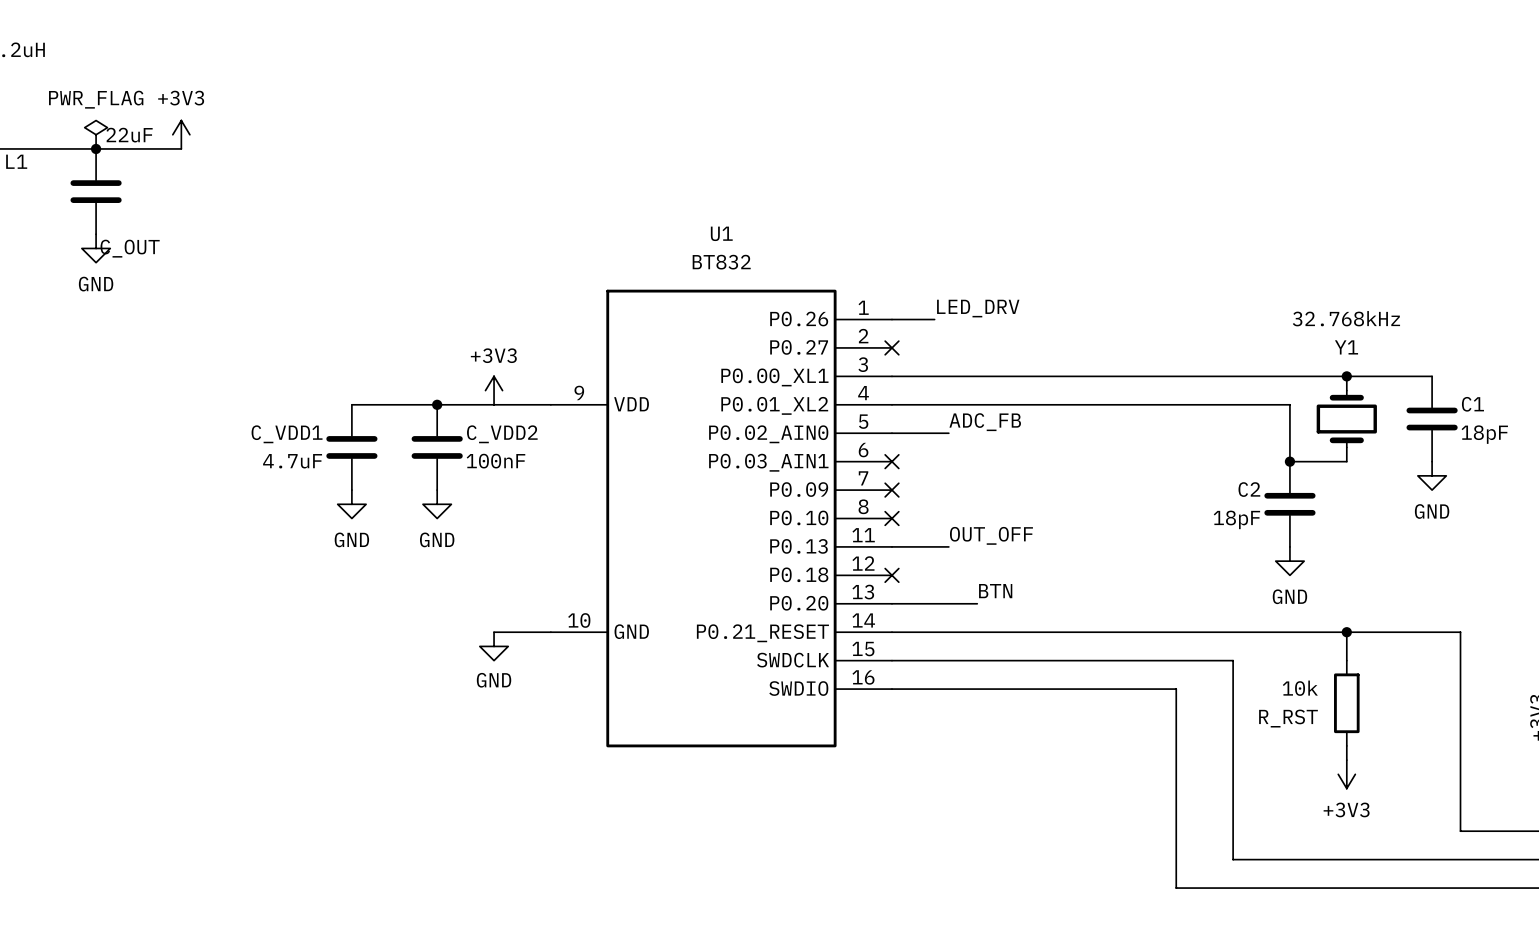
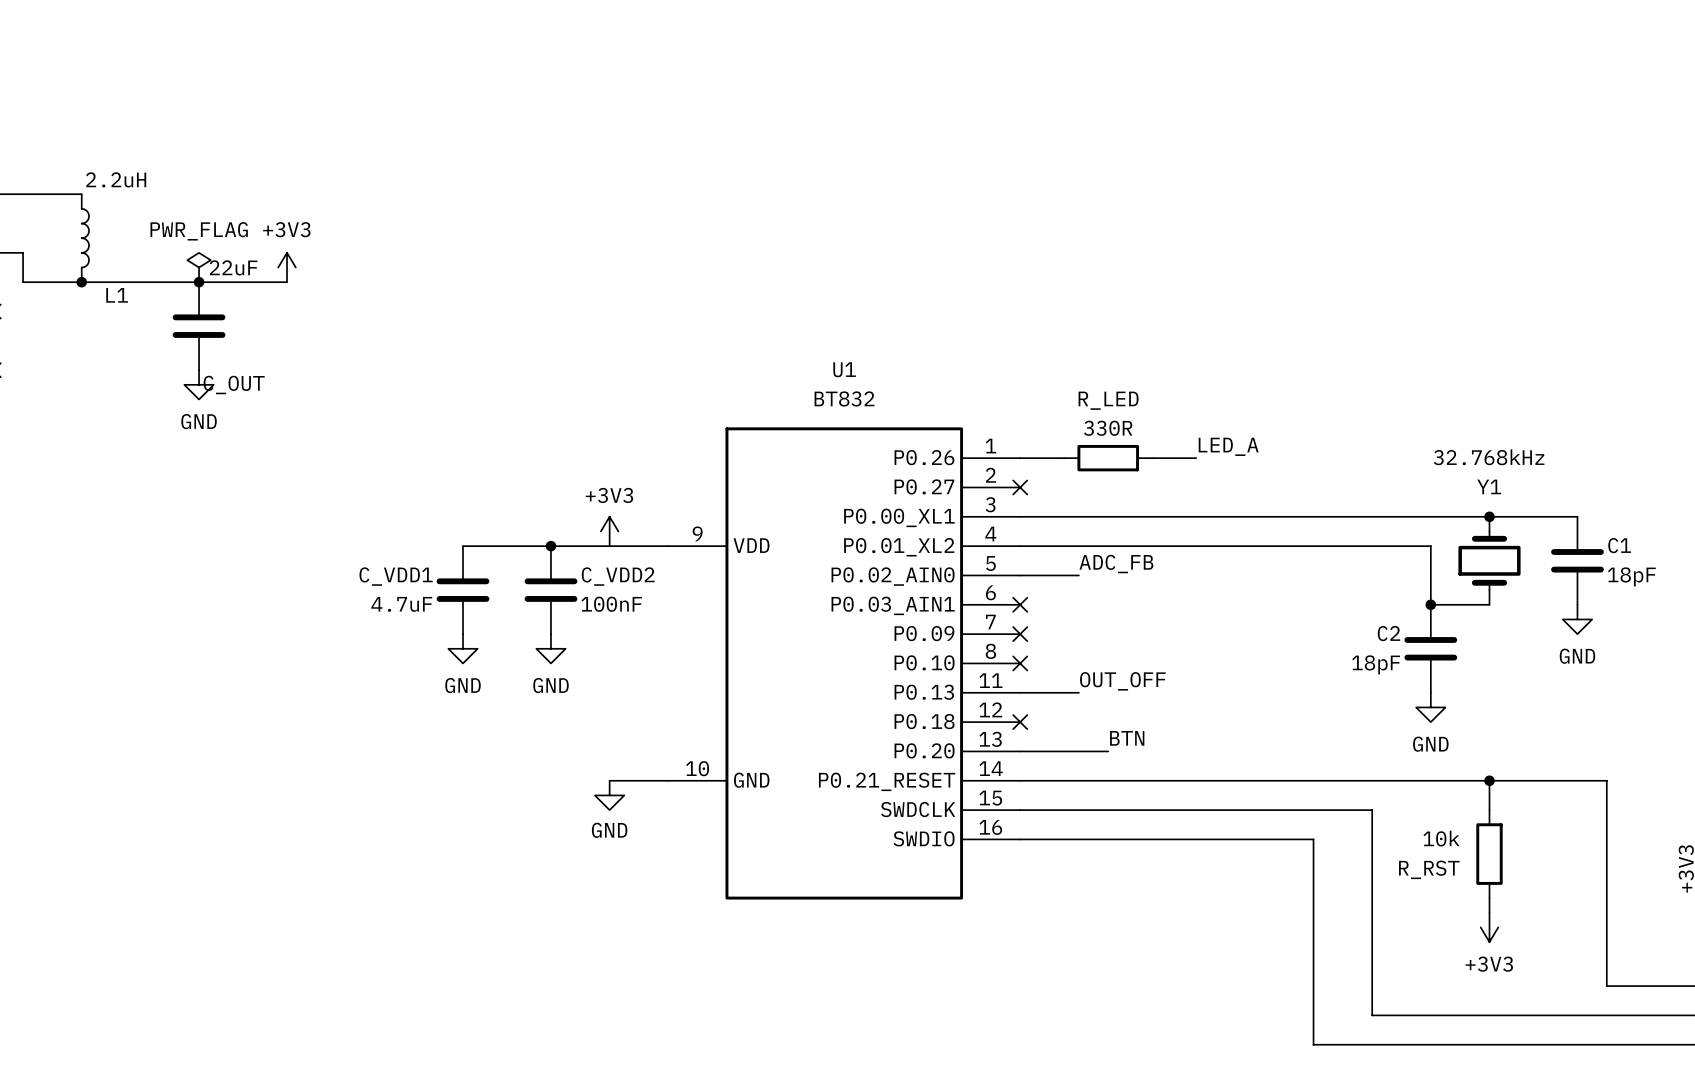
label: LED_DRV (978, 308) -> none
label: none -> LED_A (1228, 446)
R_LED: none -> 330R (1108, 458)
wire: none -> (1152, 458) (1196, 458)

